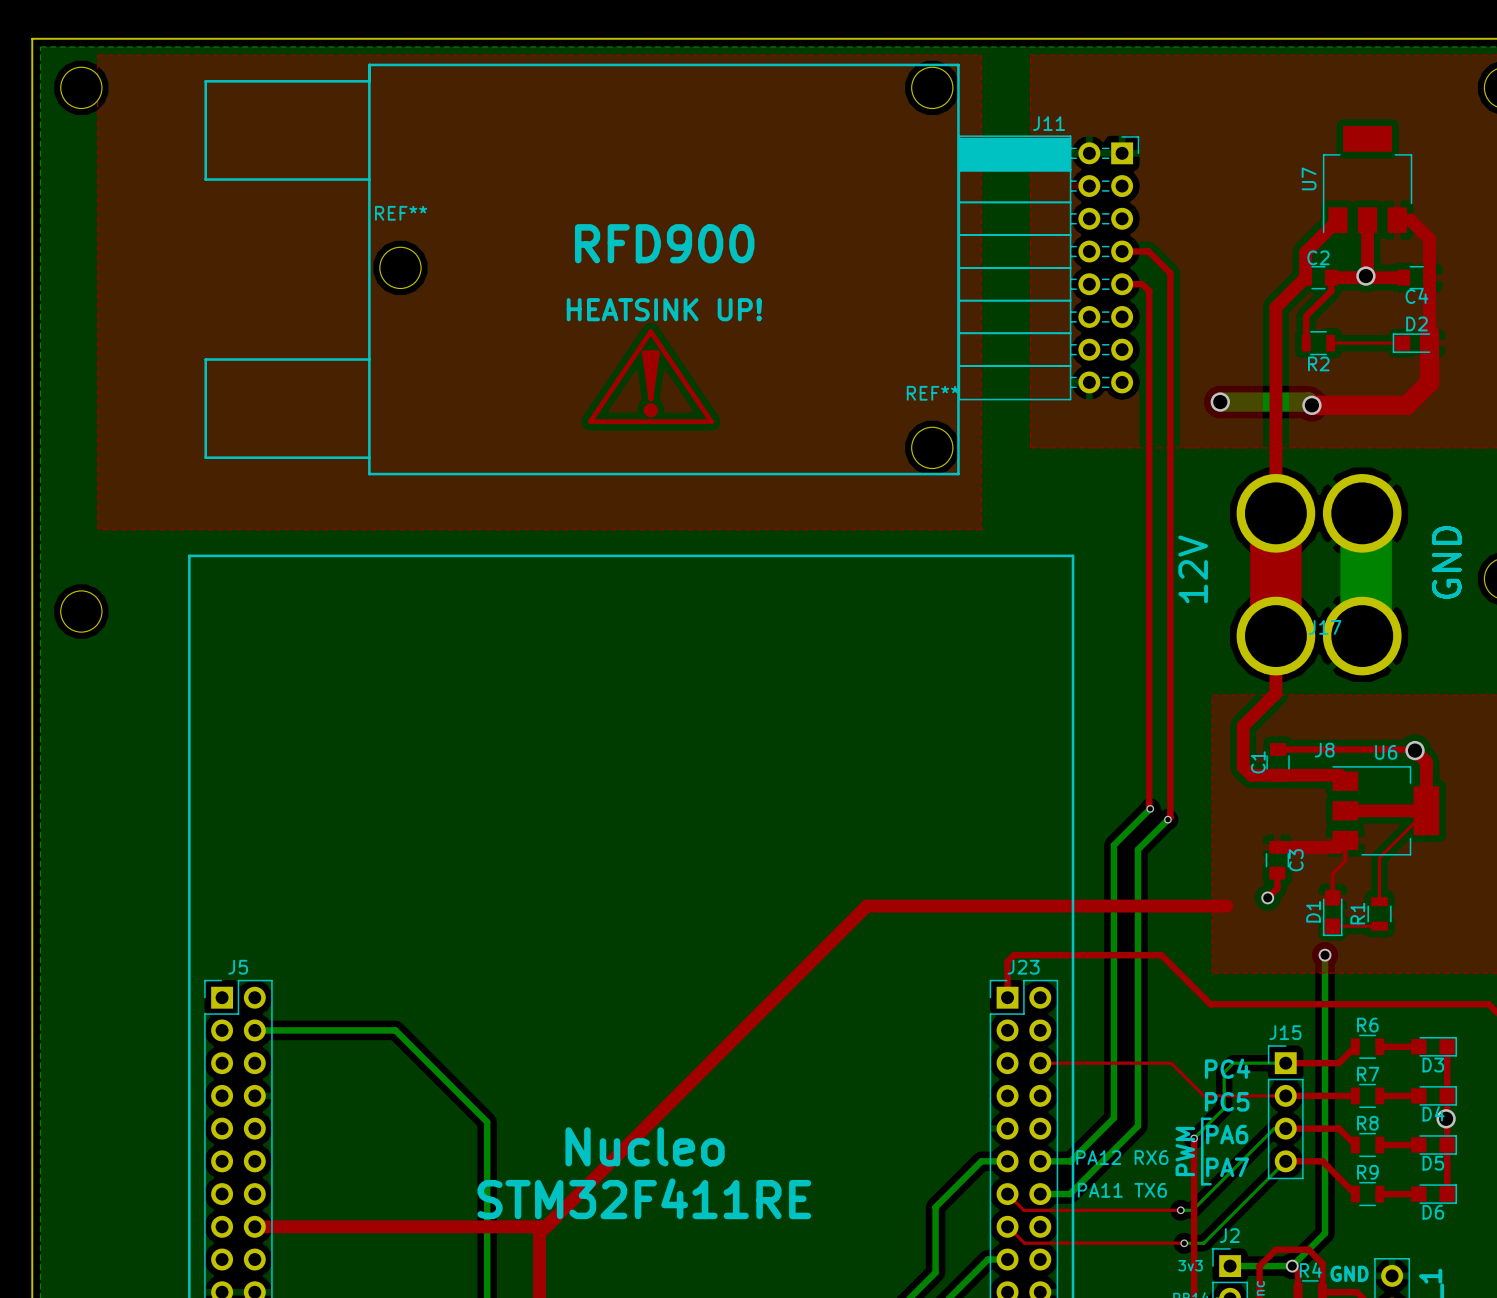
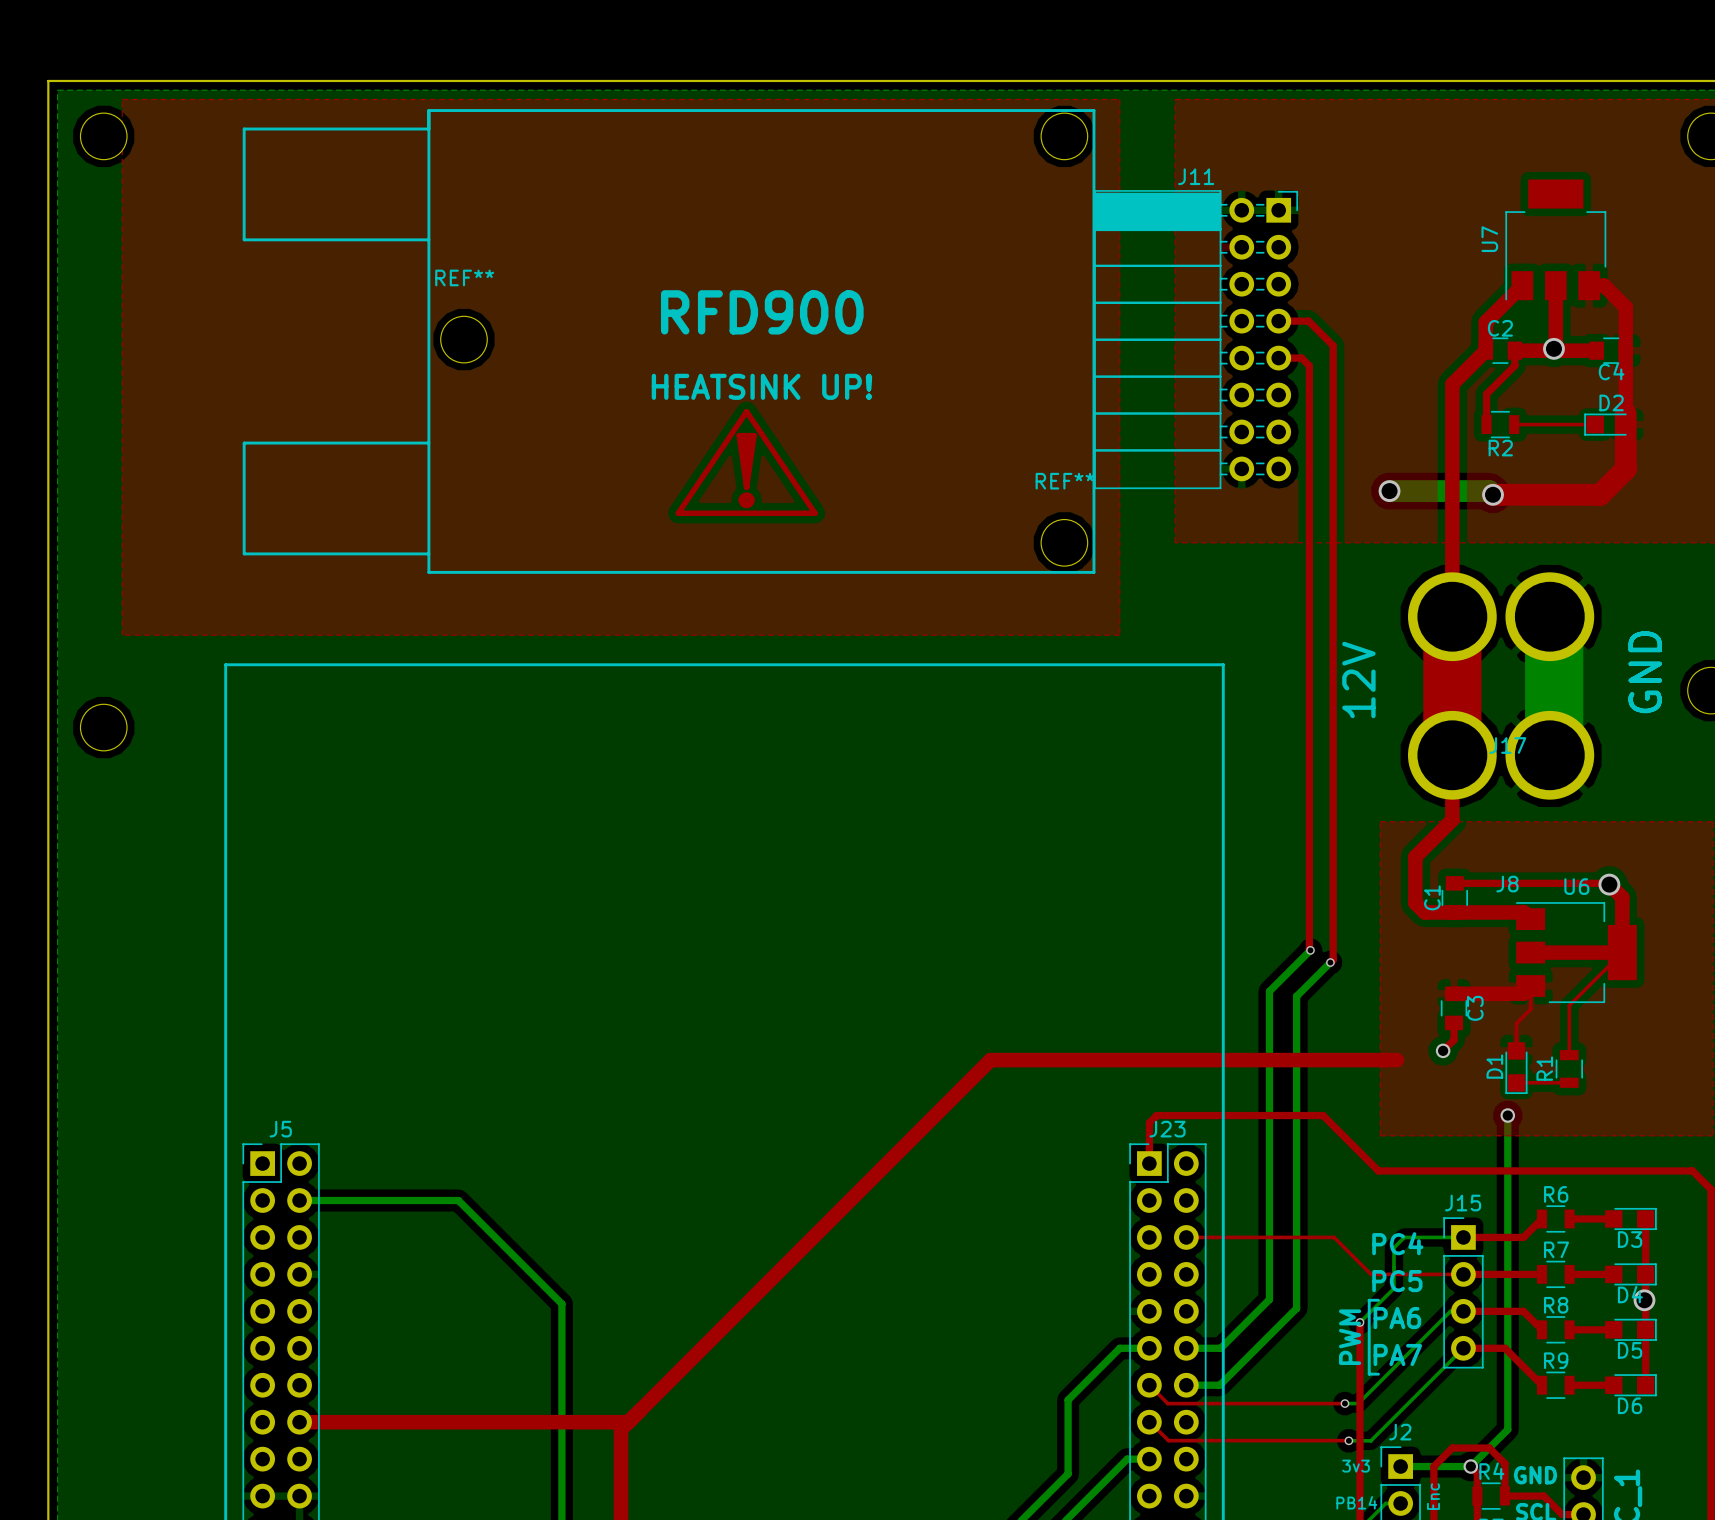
text: Nucleo (645, 1146) -> none
text: PA12 RX6 (1122, 1157) -> none
text: PA11 TX6 (1122, 1190) -> none
text: STM32F411RE (644, 1198) -> none

